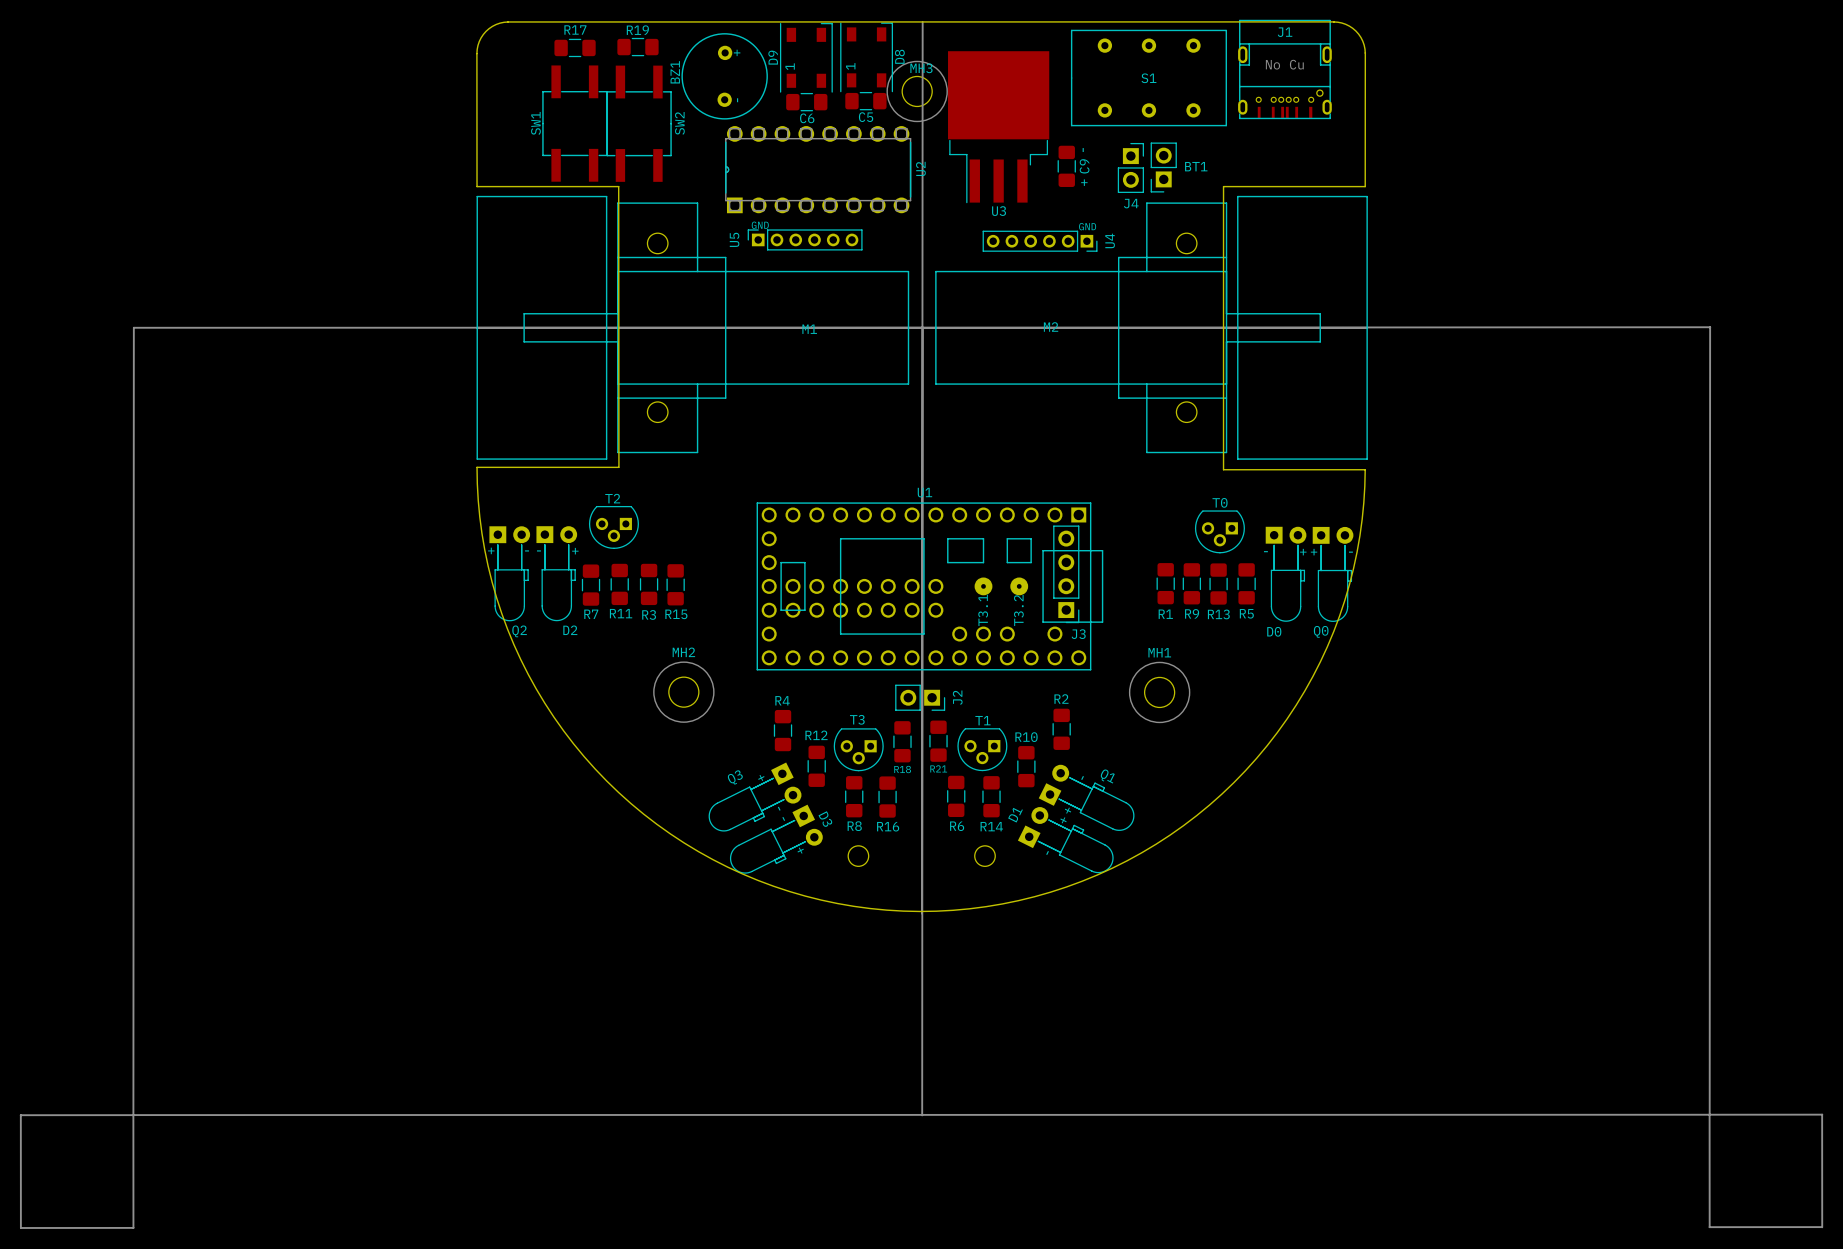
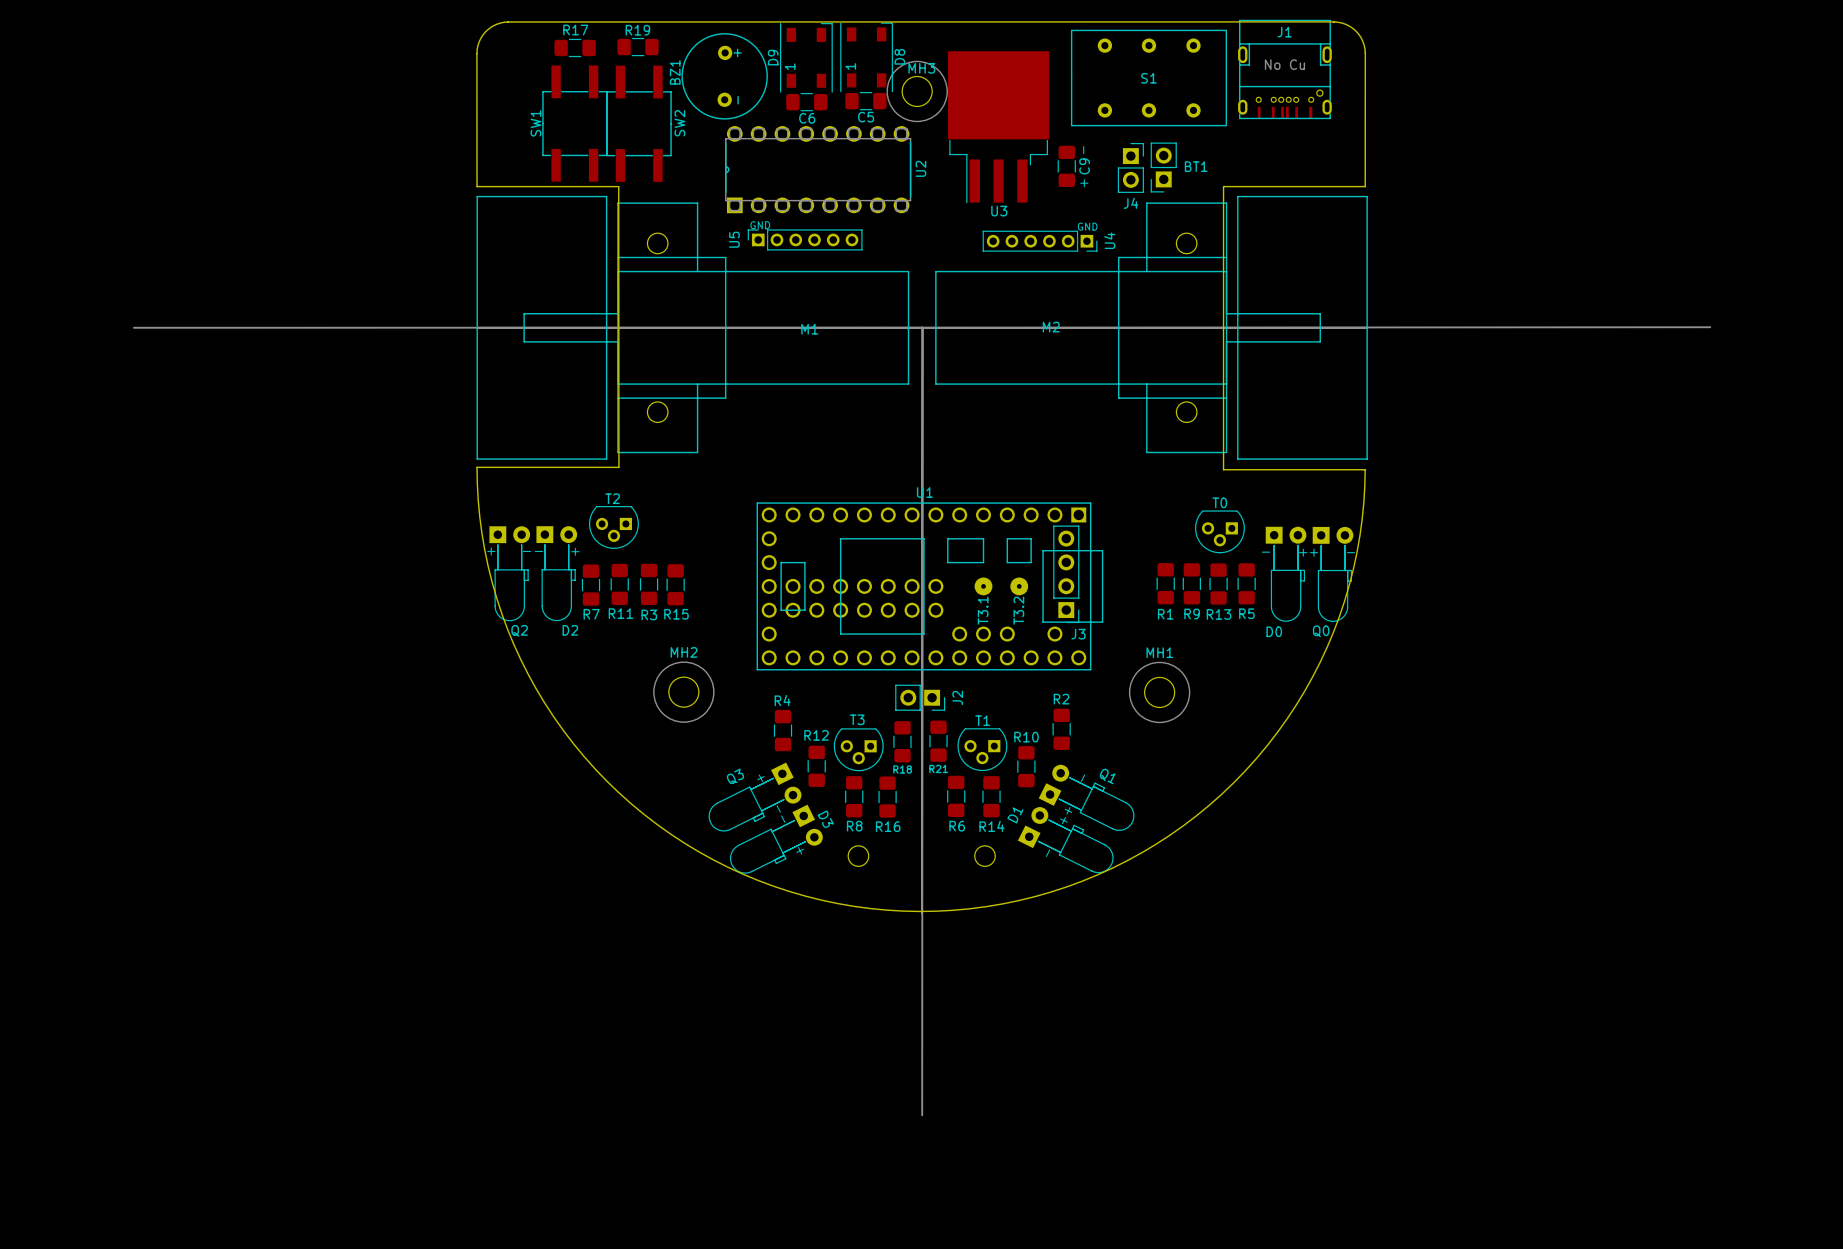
line: (922, 21) (922, 327) -> none
line: (133, 327) (133, 1115) -> none
line: (1710, 327) (1709, 1114) -> none
line: (1709, 1114) (1709, 1227) -> none
line: (1709, 1114) (133, 1115) -> none
line: (1822, 1114) (1822, 1227) -> none
line: (1822, 1114) (1709, 1114) -> none
line: (20, 1115) (133, 1115) (133, 1227) -> none
line: (20, 1115) (20, 1227) (133, 1227) -> none
line: (1822, 1227) (1709, 1227) -> none

